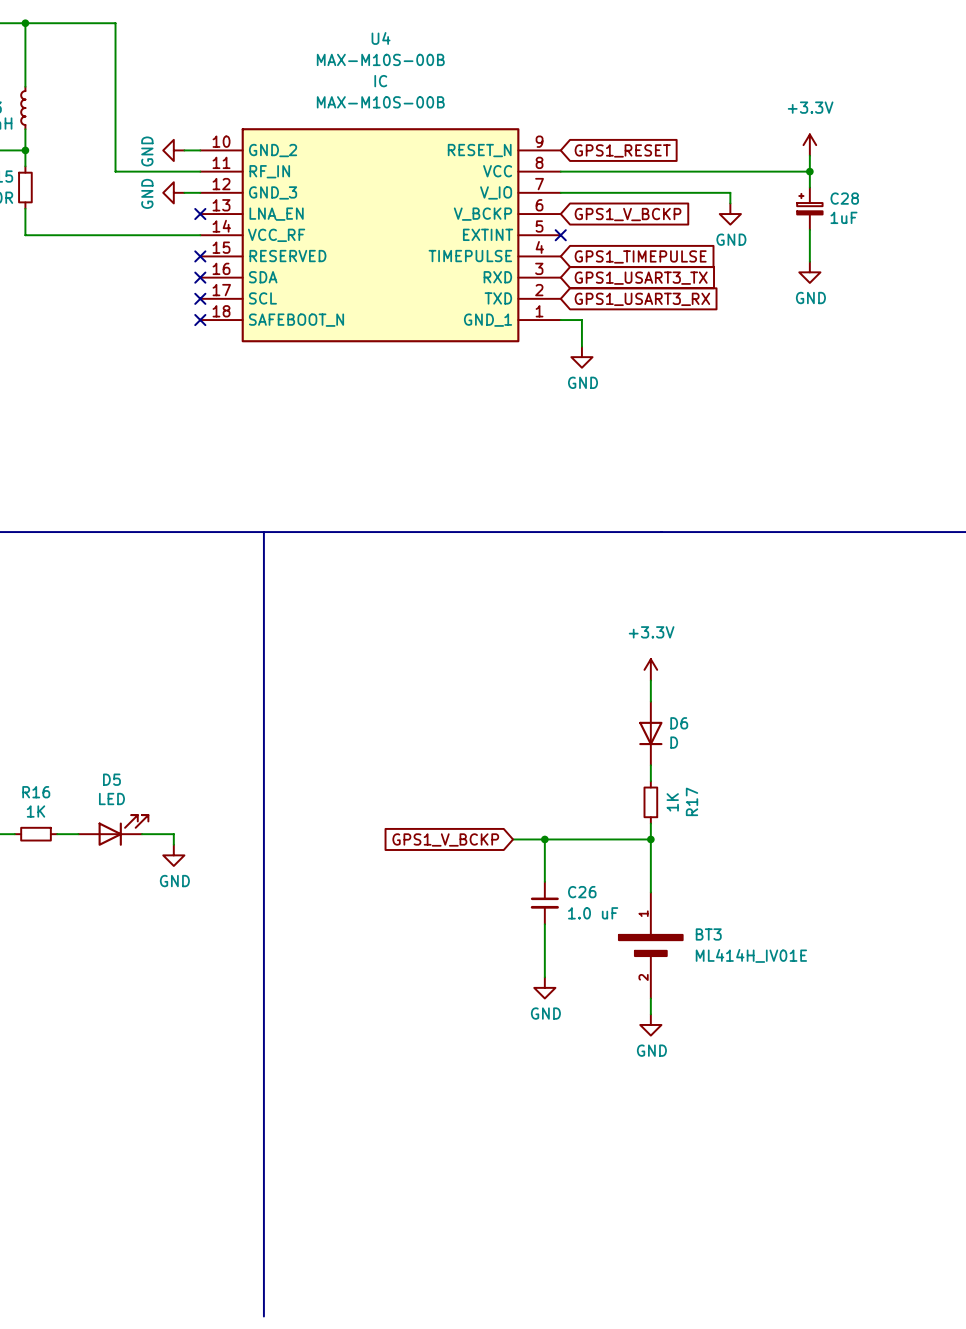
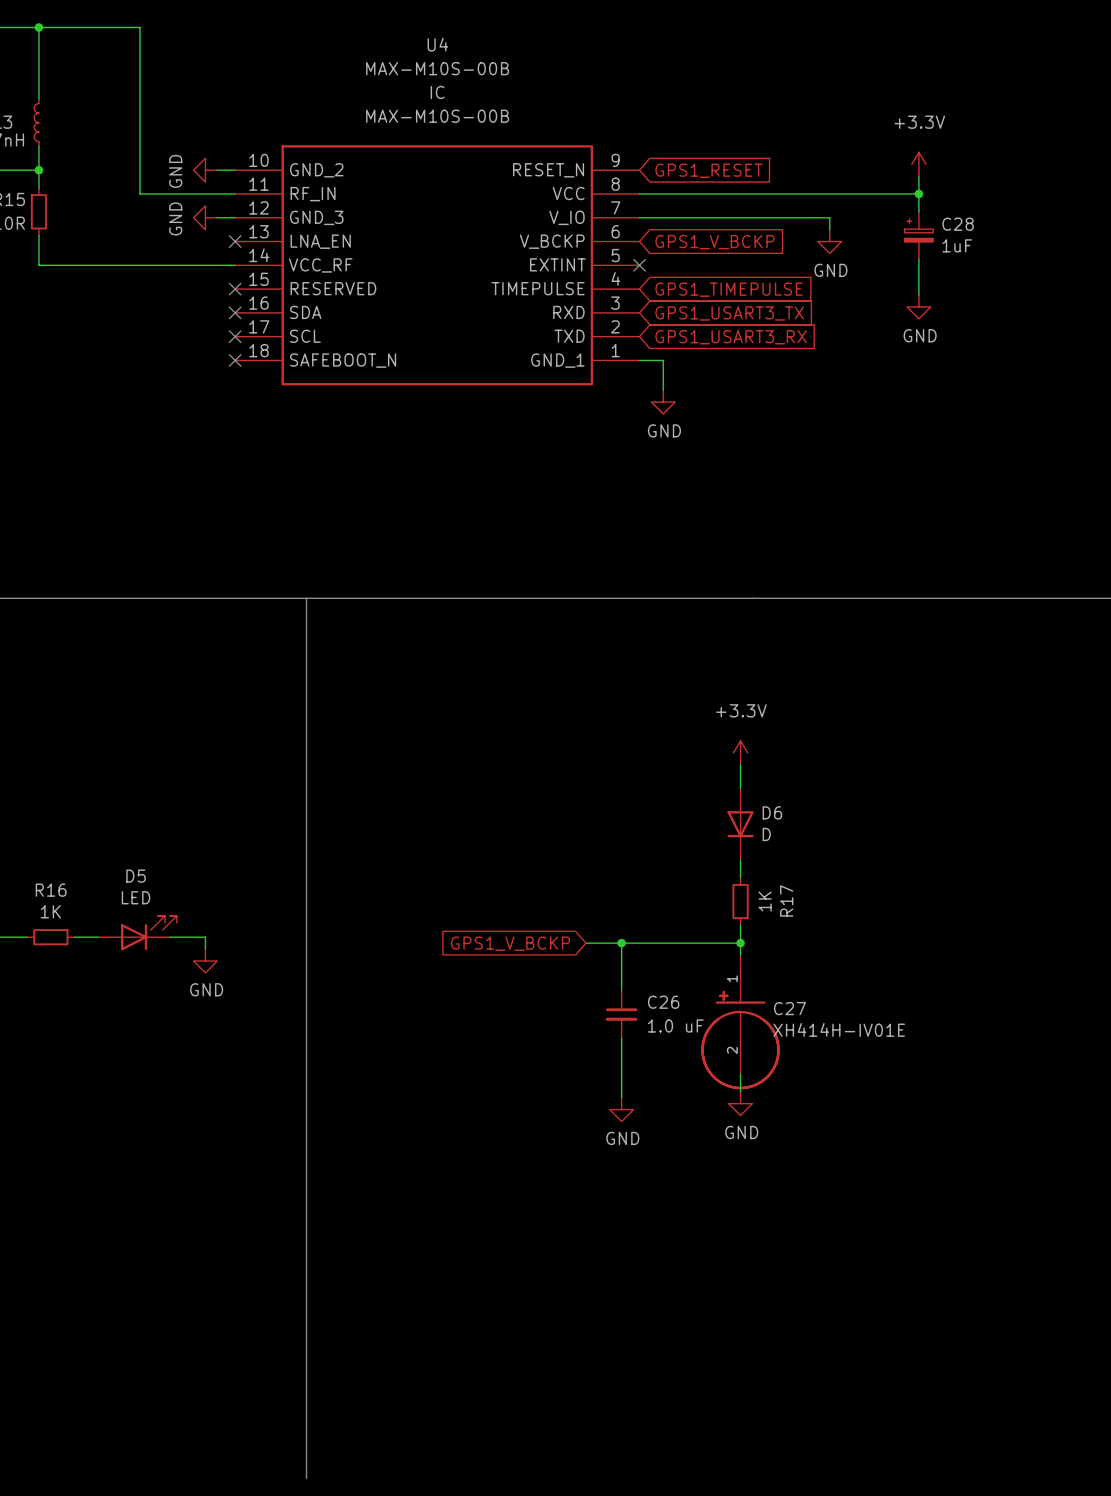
C27: none -> XH414H-IV01E (740, 1022)
BT3: ML414H_IV01E (650, 945) -> none
power symbol position: GND (650, 1024) -> GND (740, 1103)

